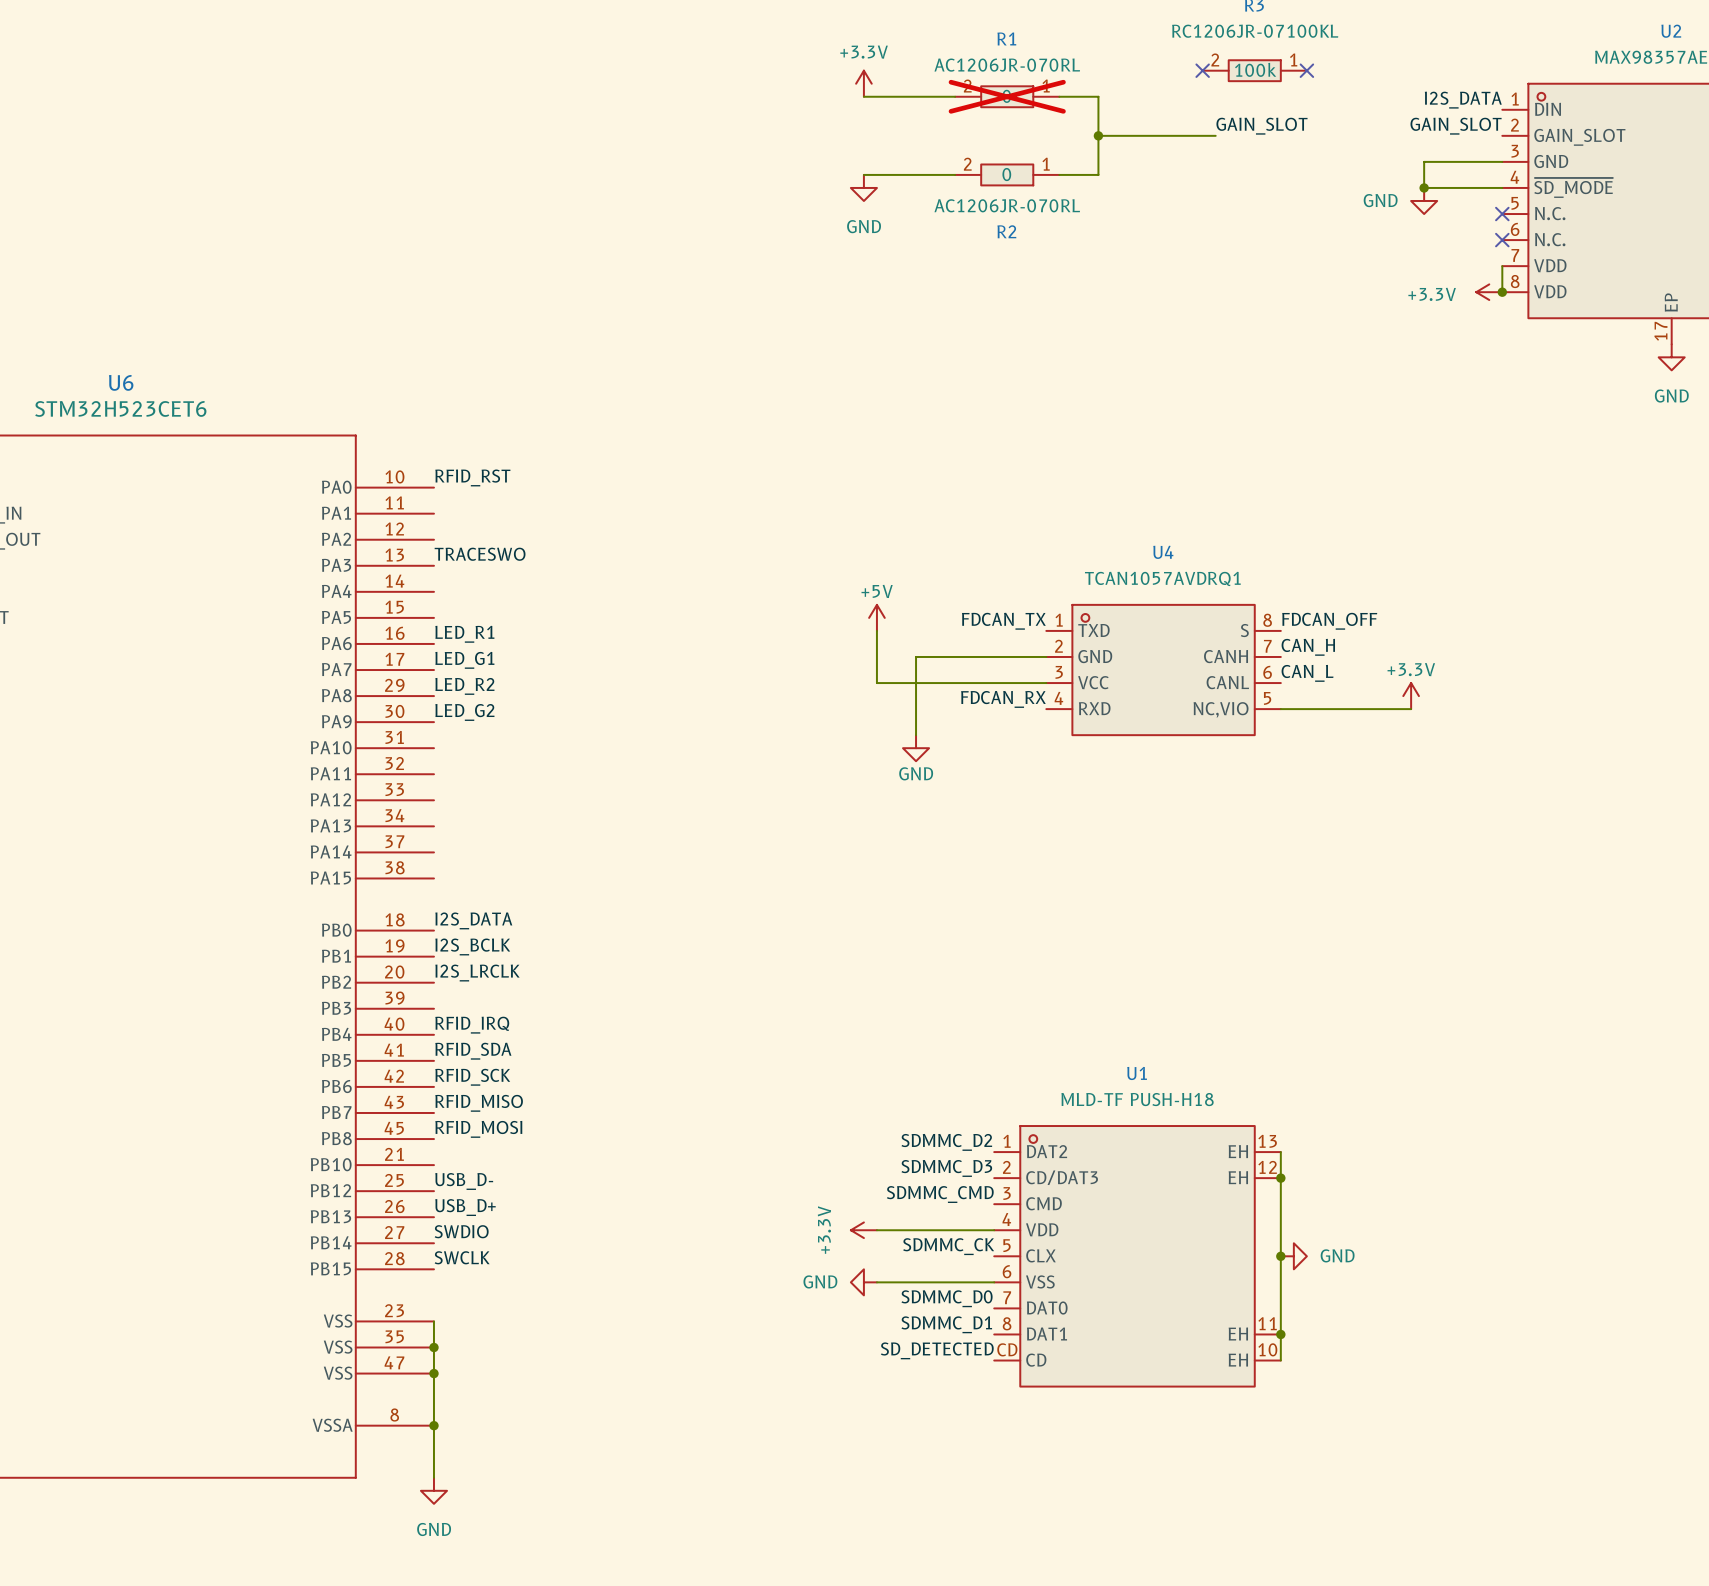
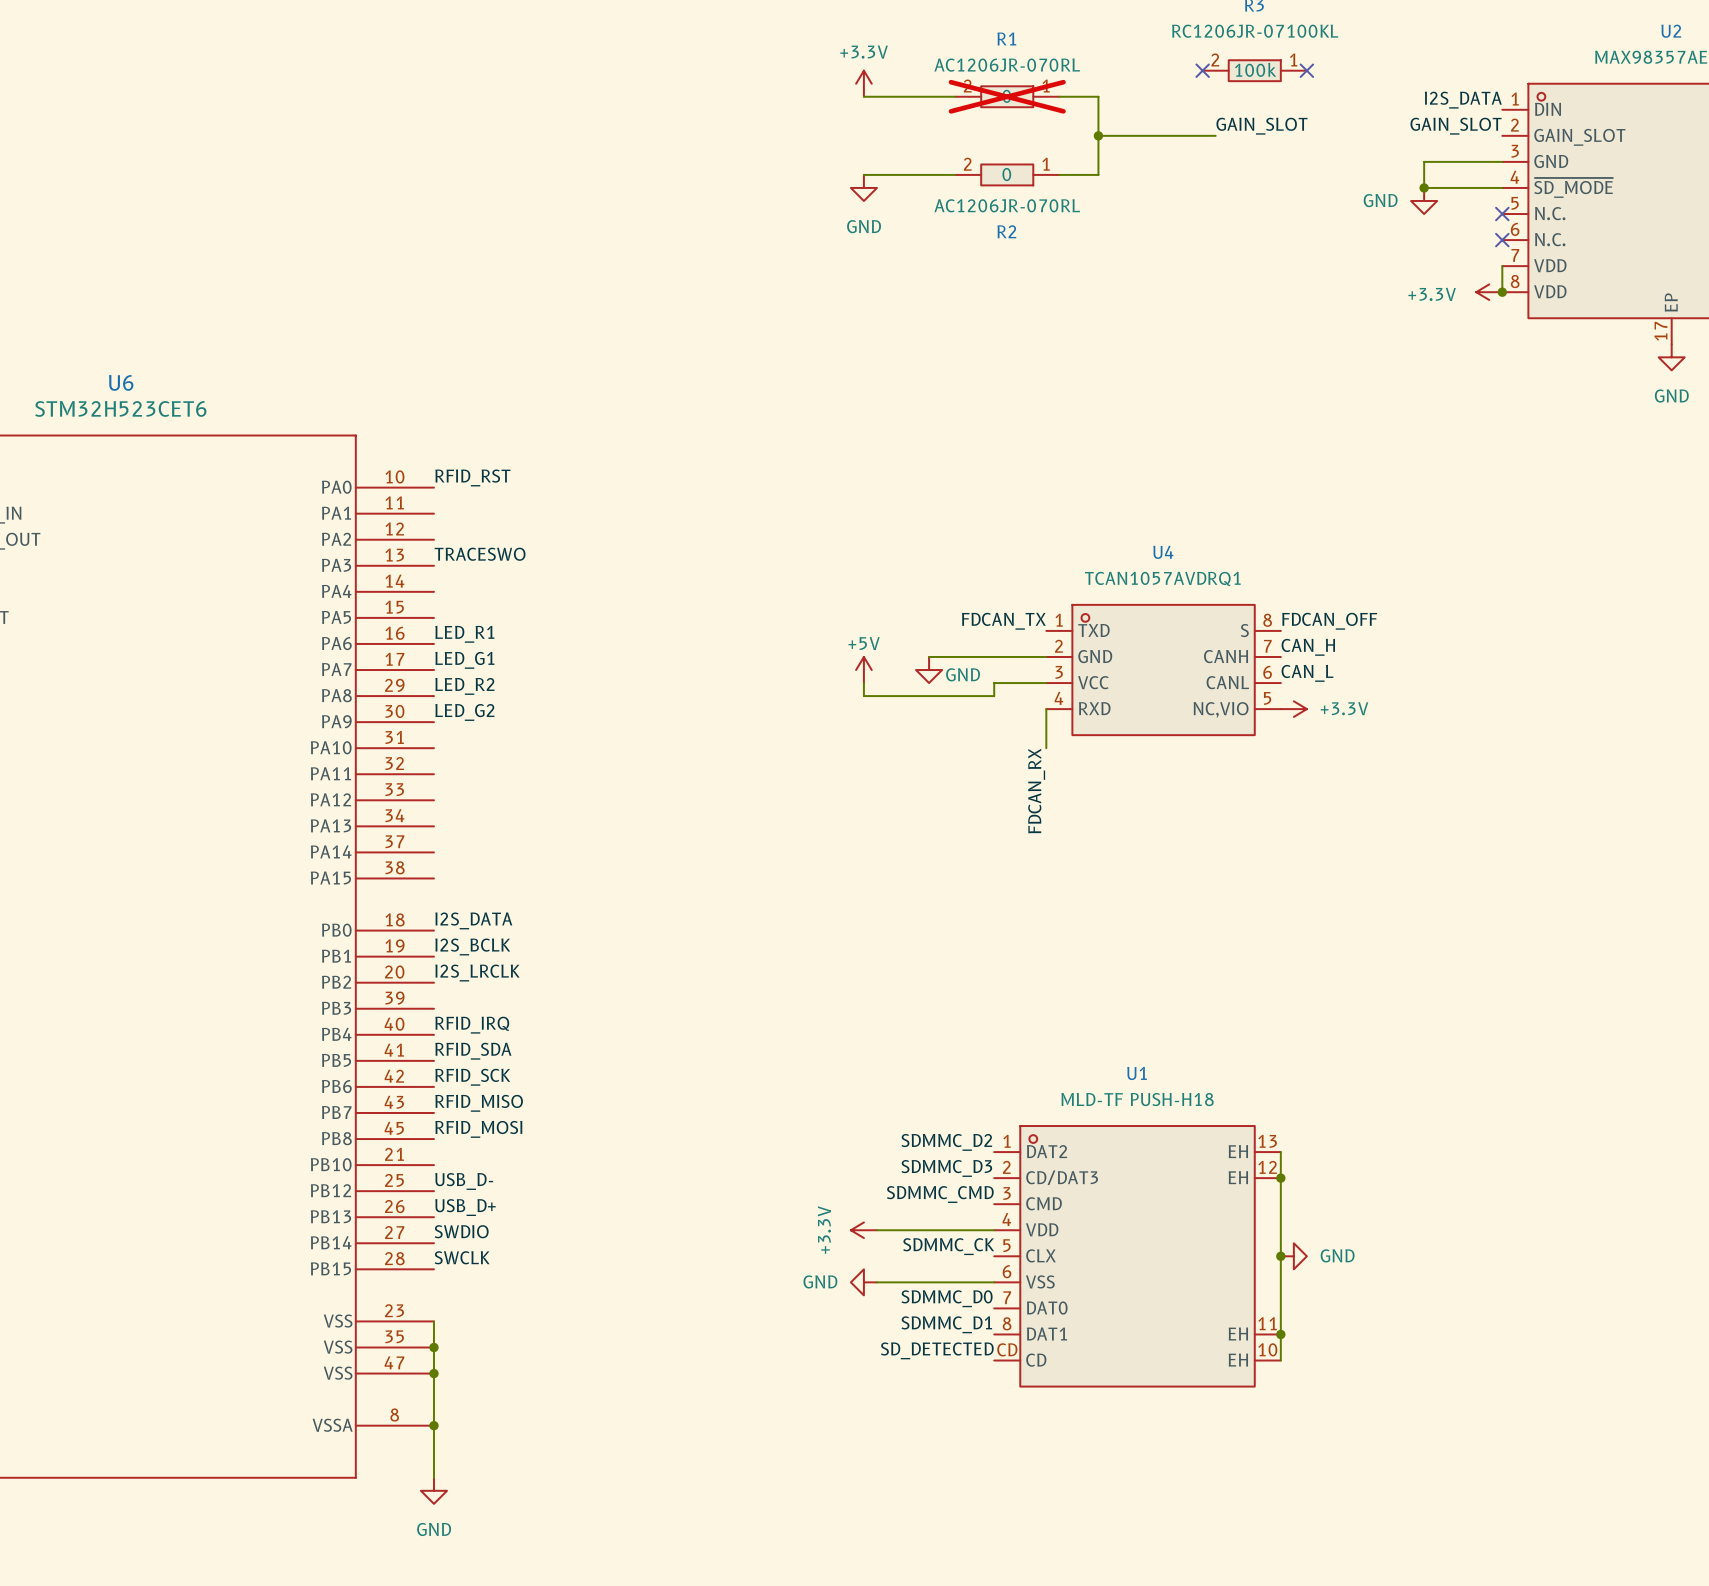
power symbol position: +5V (876, 617) -> +5V (863, 670)
wire: (876, 630) (876, 683) (994, 683) -> (863, 683) (863, 696) (994, 696) (994, 683)
wire: (929, 656) (916, 656) (916, 735) -> none
power symbol text position: +3.3V (1411, 669) -> +3.3V (1344, 708)
power symbol rotation: 0° (1411, 696) -> 90° clockwise (1293, 709)
power symbol position: +3.3V (1411, 696) -> +3.3V (1293, 709)
label rotation: 0° (1003, 699) -> 90° counterclockwise (1036, 791)
label position: FDCAN_RX (1003, 699) -> FDCAN_RX (1036, 791)
wire: none -> (1046, 709) (1046, 748)
wire: (1280, 709) (1411, 709) -> none
power symbol position: GND (916, 748) -> GND (929, 670)
power symbol text position: GND (916, 773) -> GND (963, 674)

